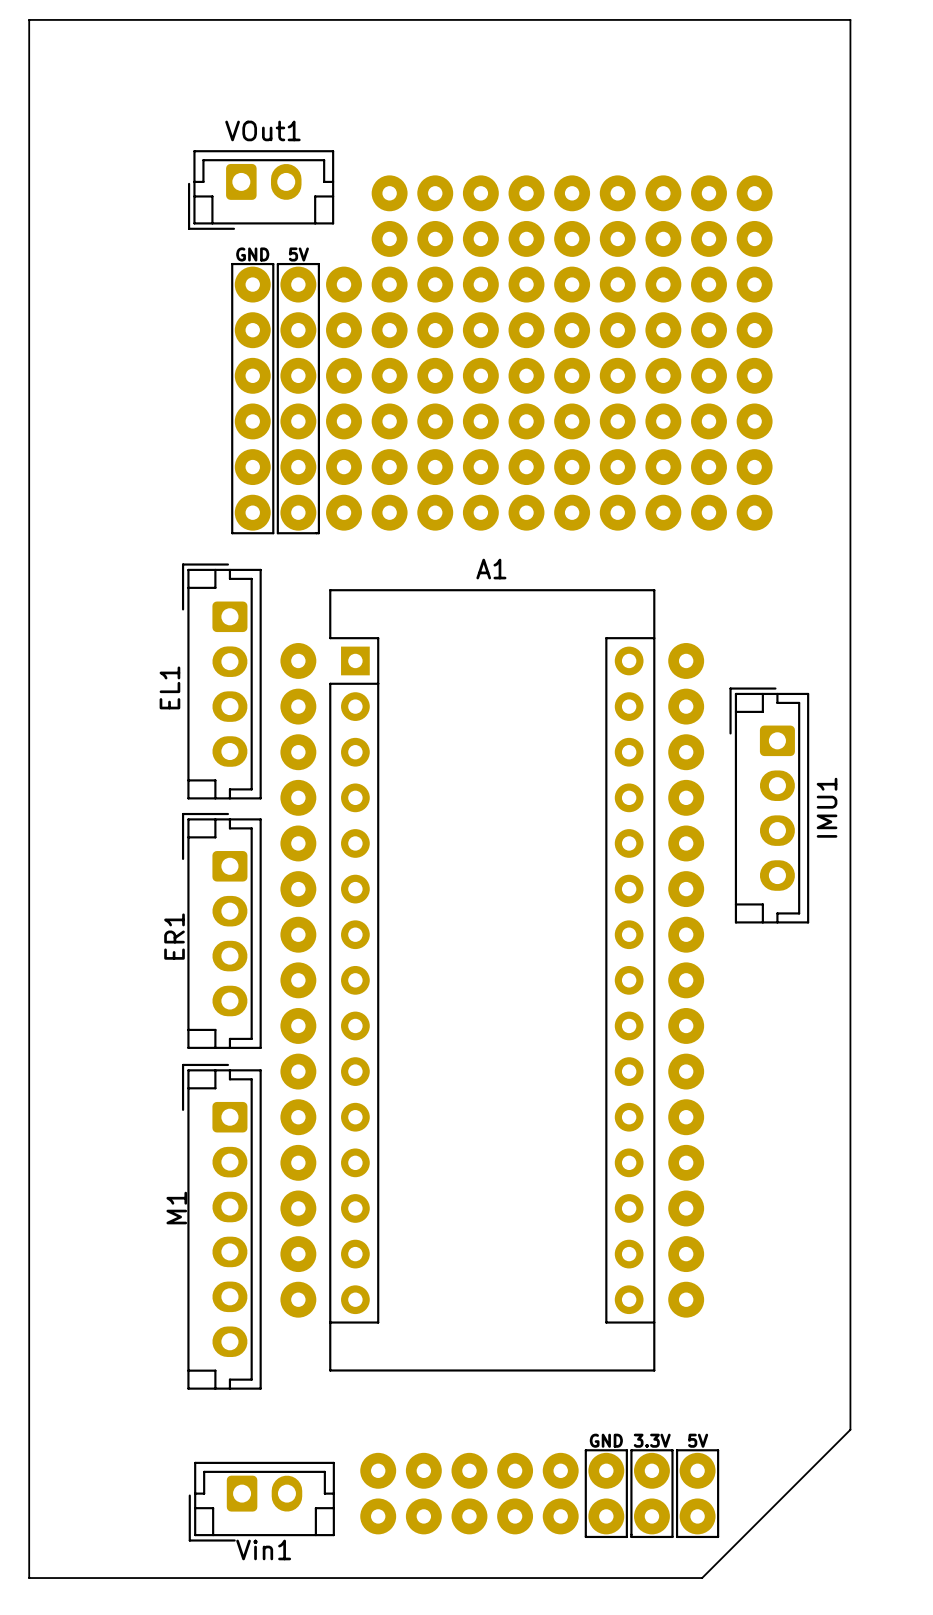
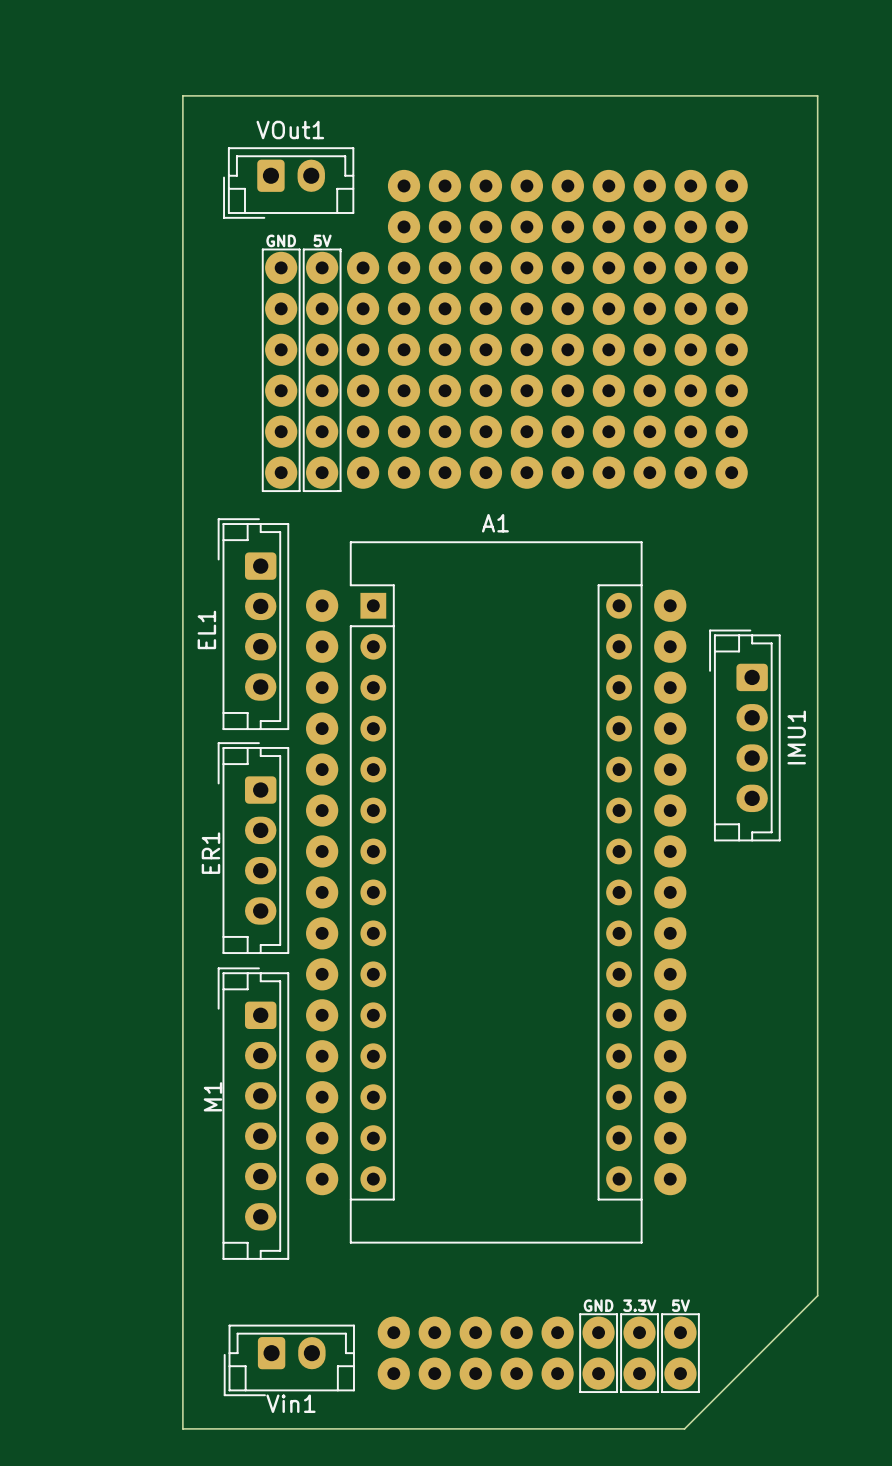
board edge: (850, 92) (850, 19) (29, 19) (29, 1578) (143, 1578) -> (817, 95) (182, 95) (182, 1428)

